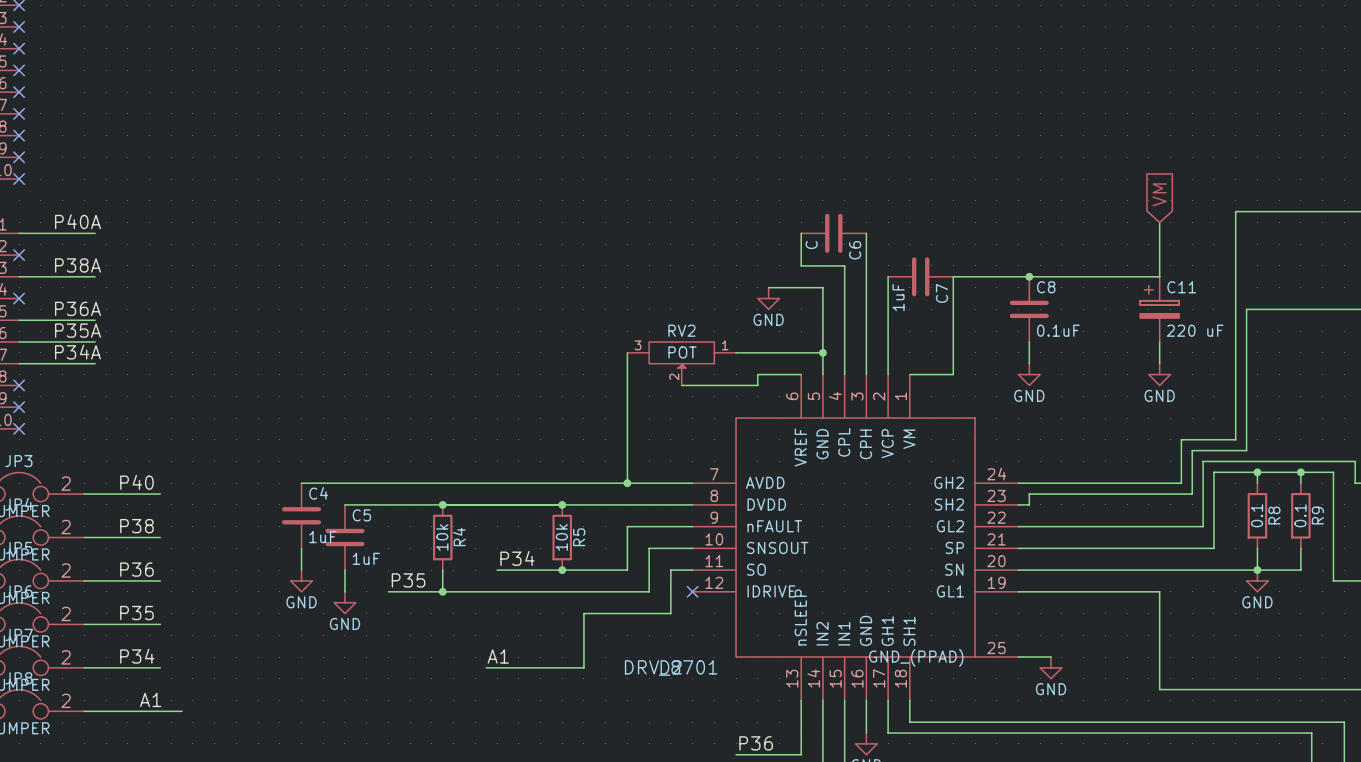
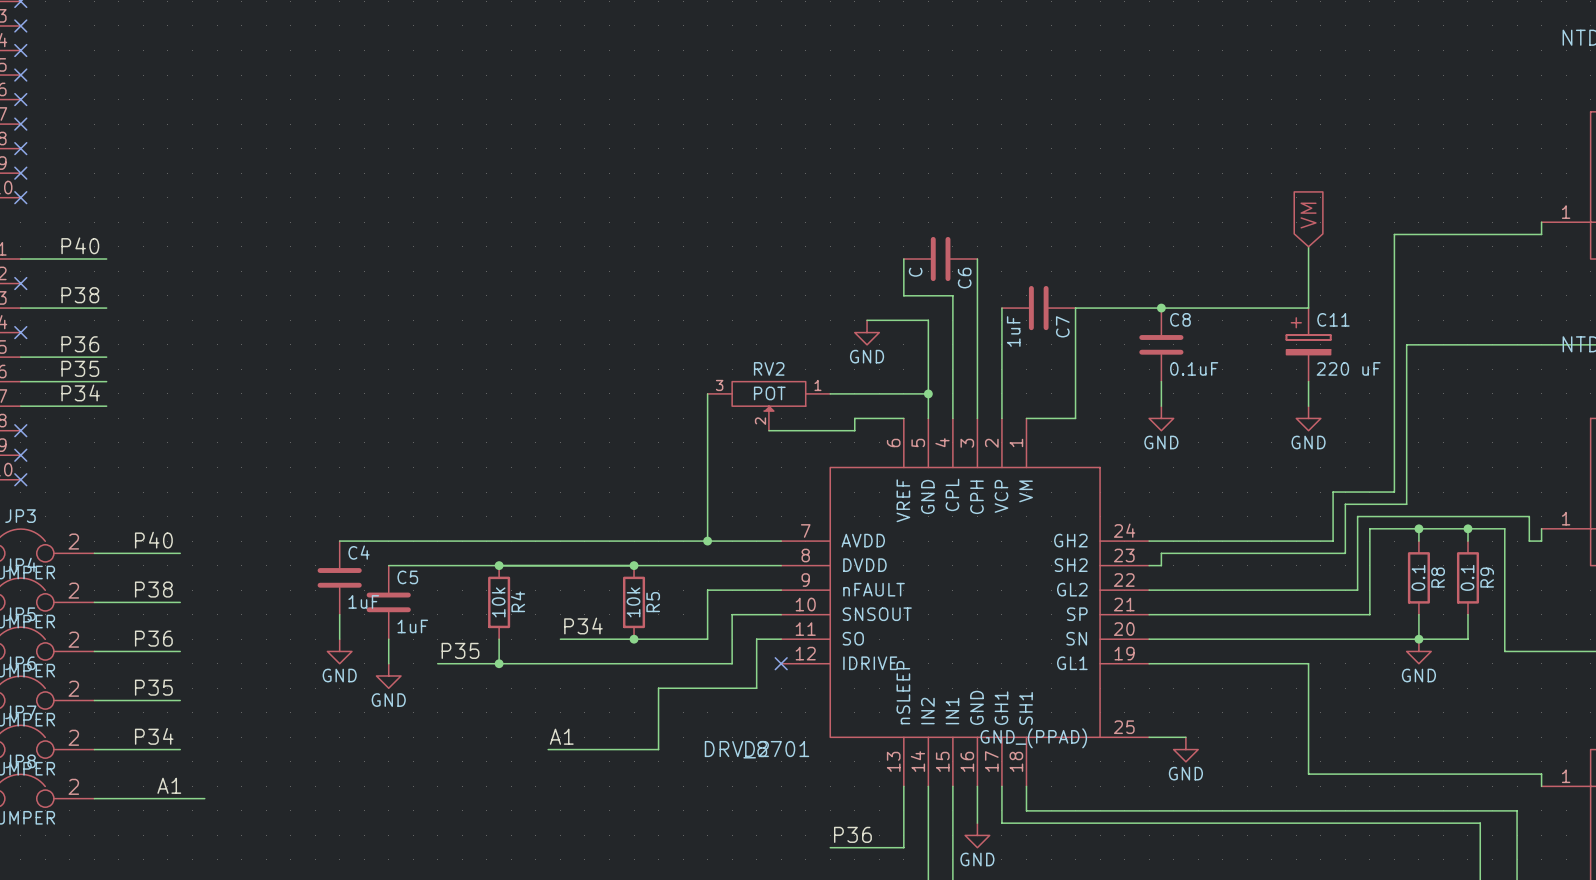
label: P40A (78, 221) -> P40 (80, 245)
label: P38A (78, 265) -> P38 (80, 295)
label: P36A (78, 308) -> P36 (80, 344)
label: P35A (78, 330) -> P35 (80, 368)
label: P34A (78, 352) -> P34 (80, 392)

